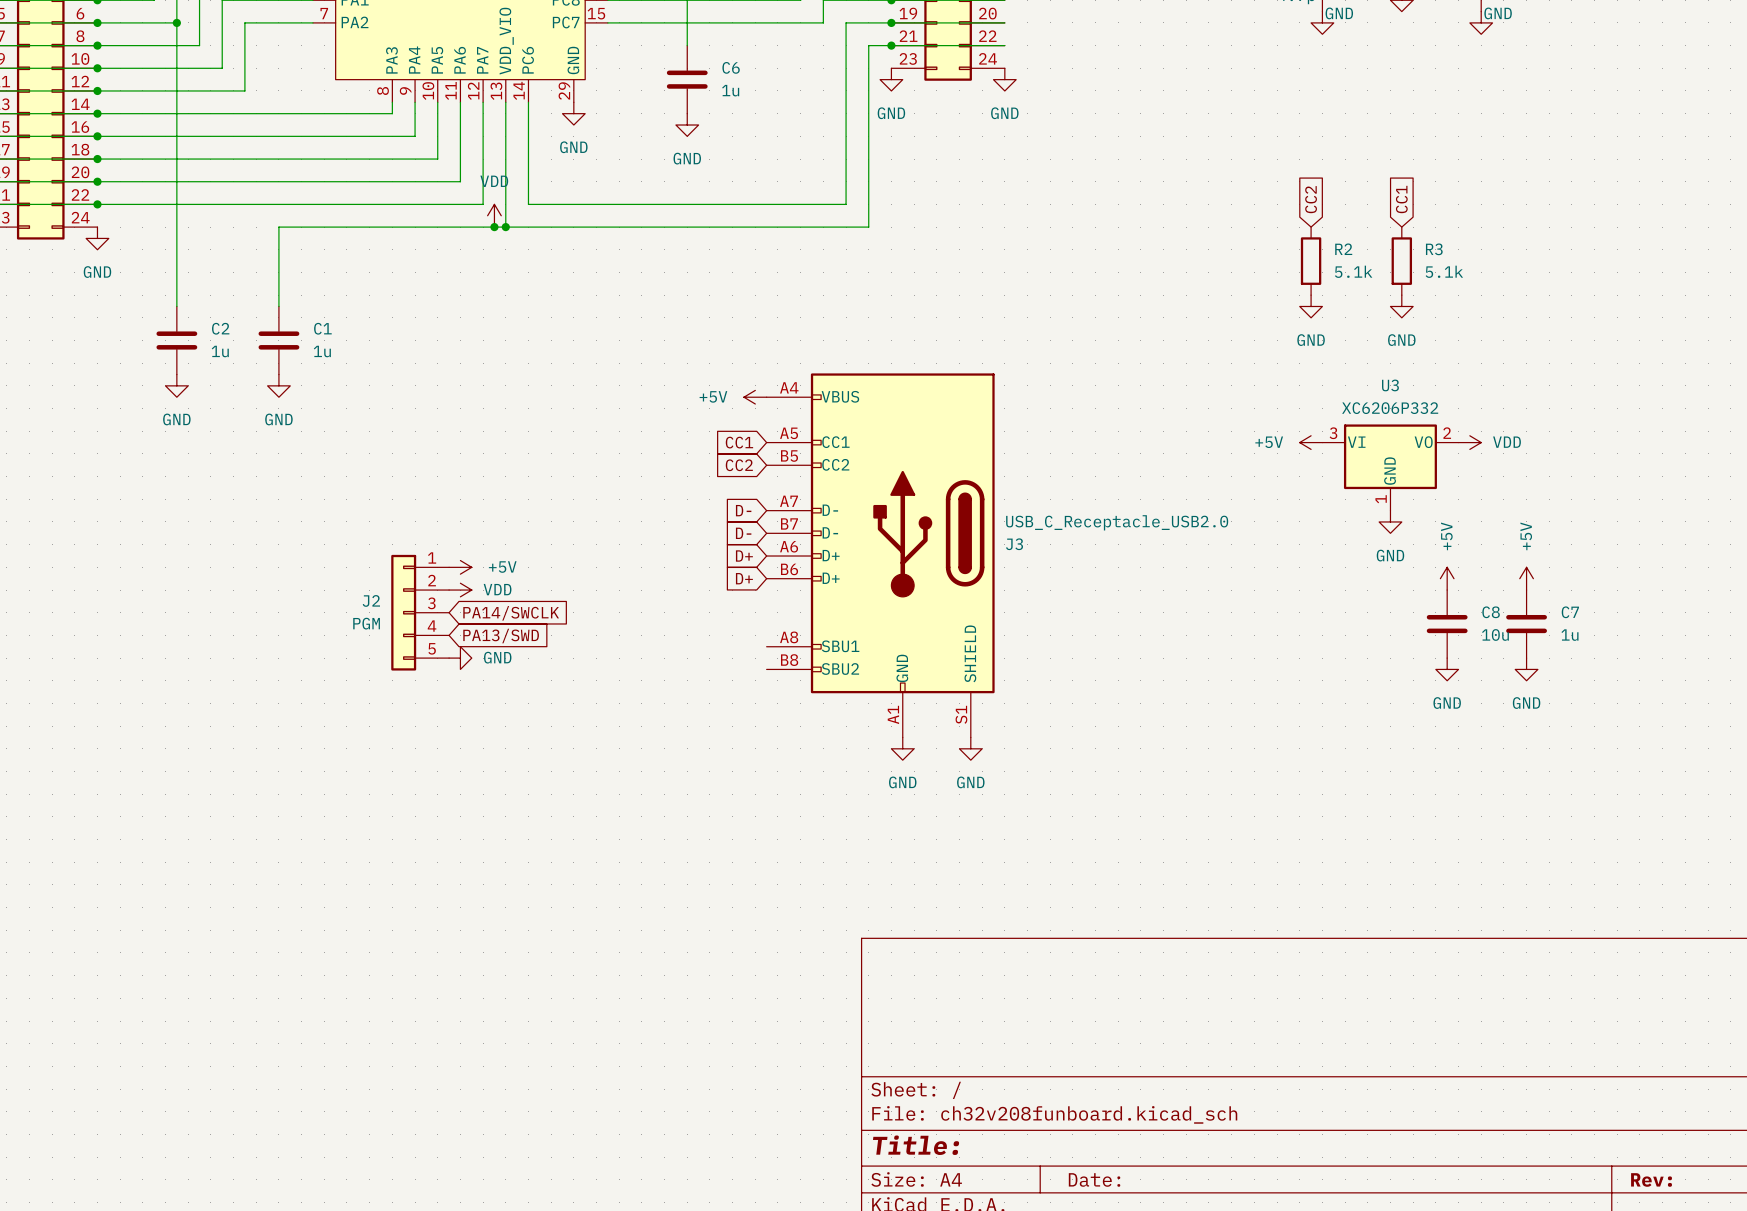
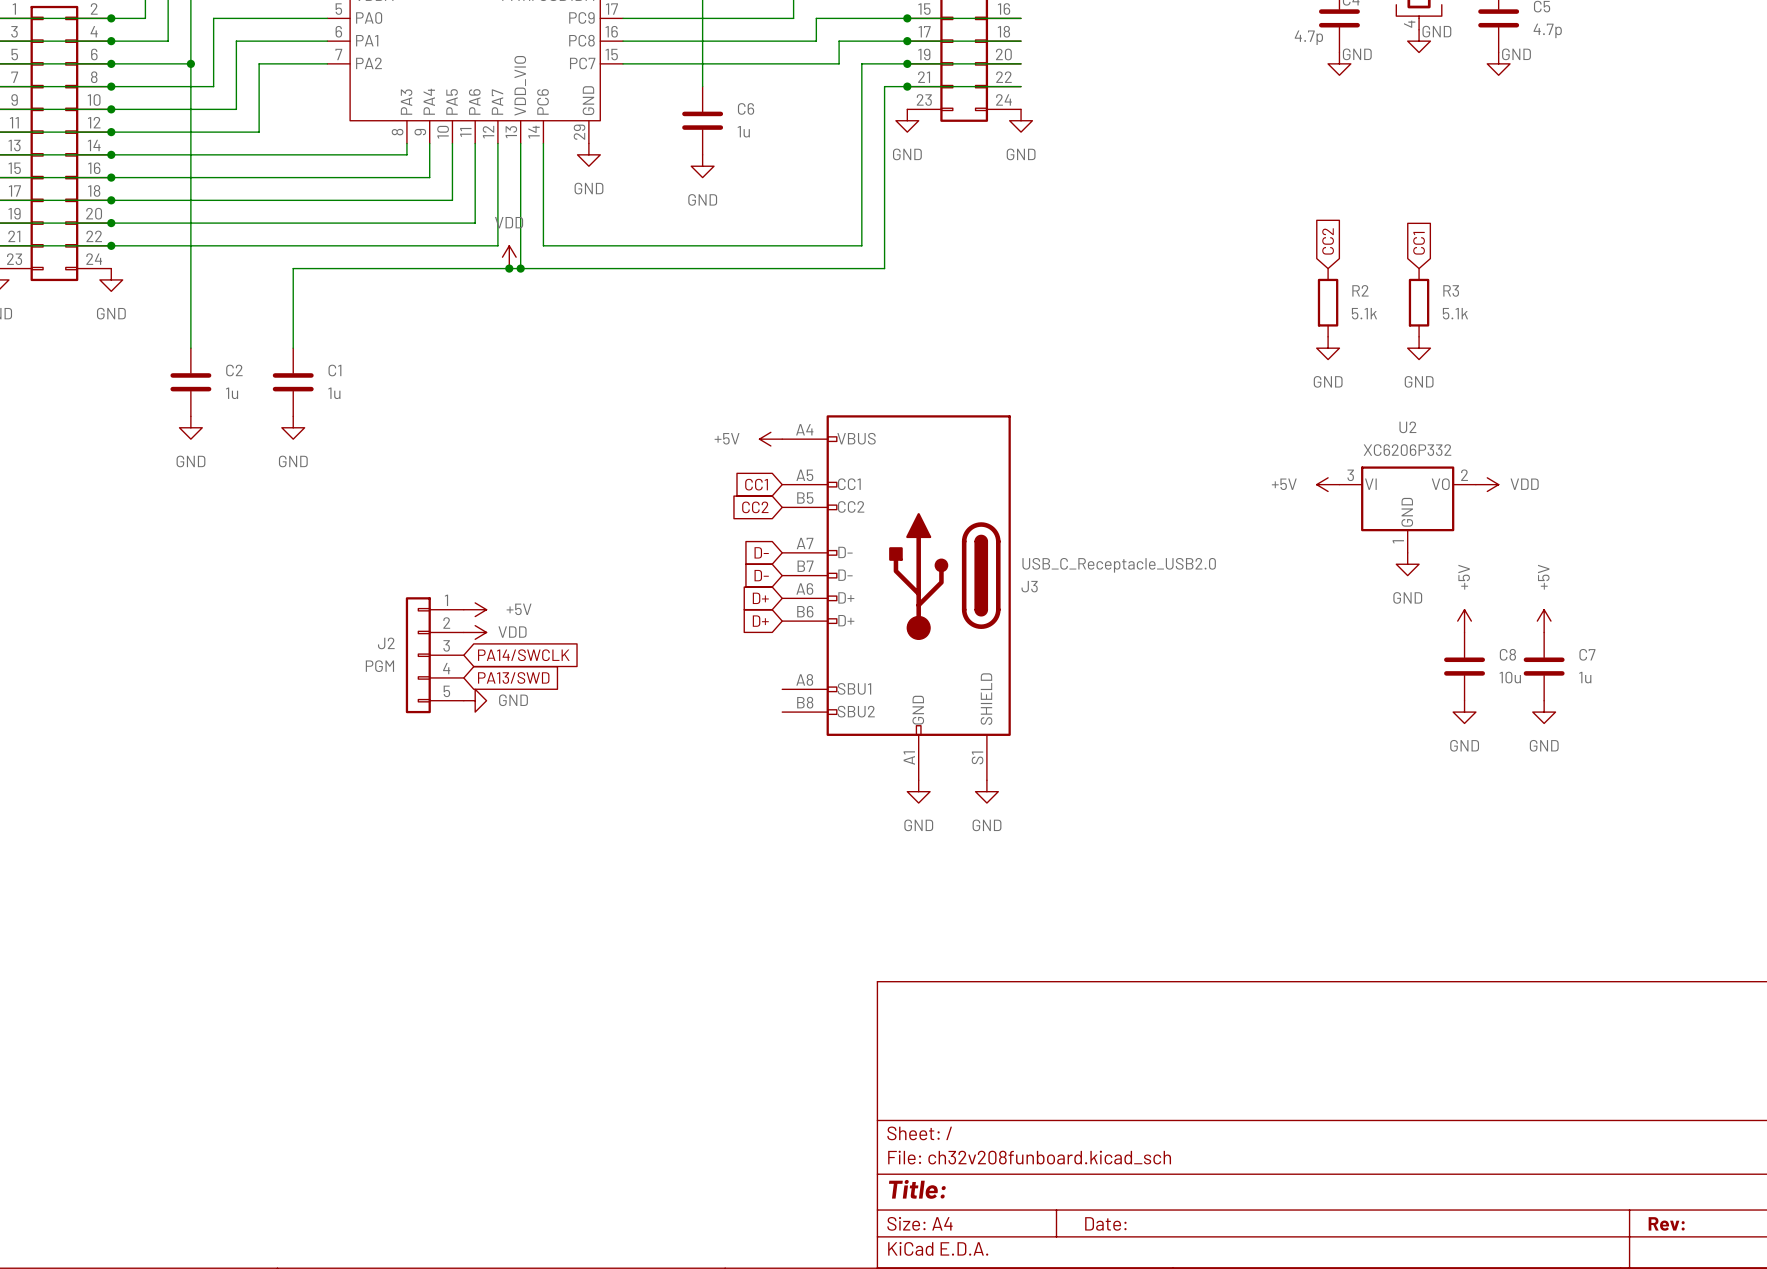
U3 name: U3 (1390, 385) -> U2 (1407, 427)

